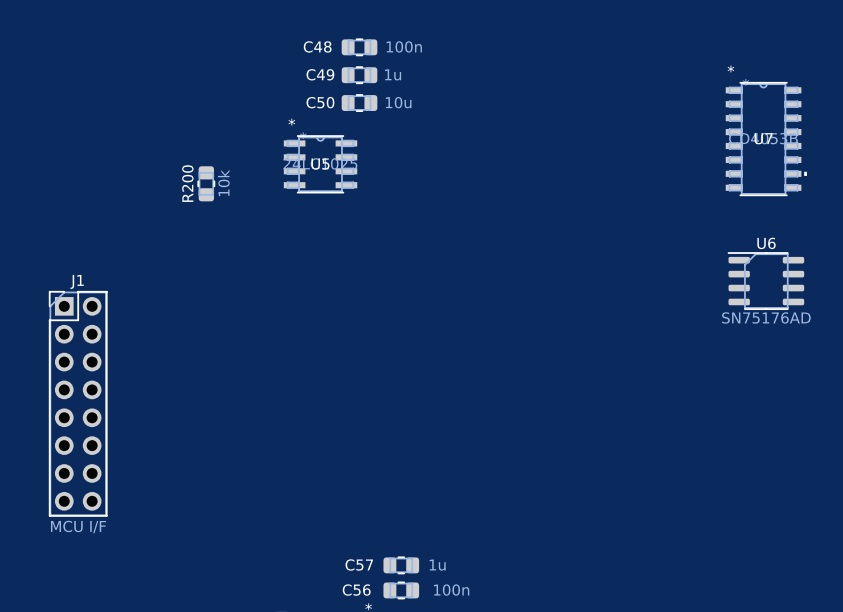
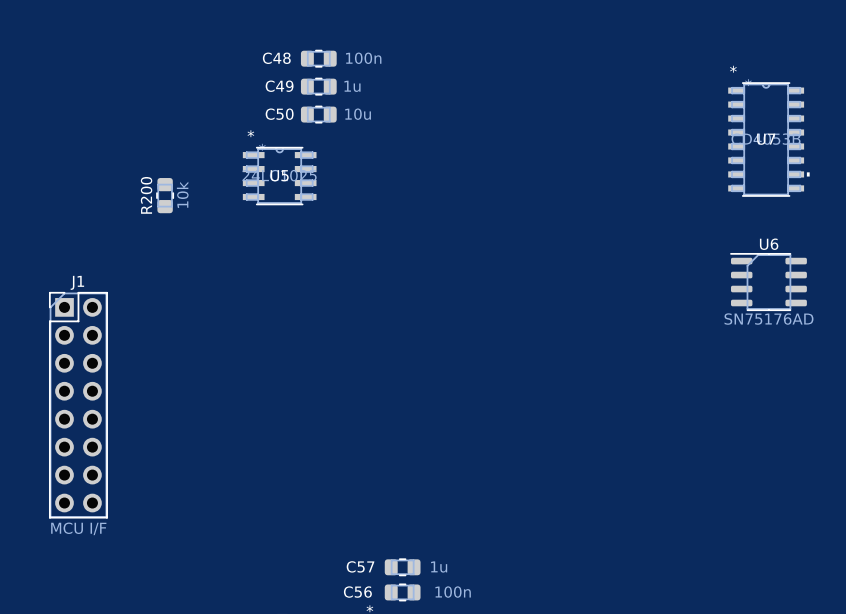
C48 position: (359, 47) -> (318, 58)
C49 position: (359, 75) -> (318, 86)
C50 position: (359, 103) -> (318, 114)
U5 position: (320, 164) -> (279, 176)
R200 position: (206, 183) -> (165, 195)

